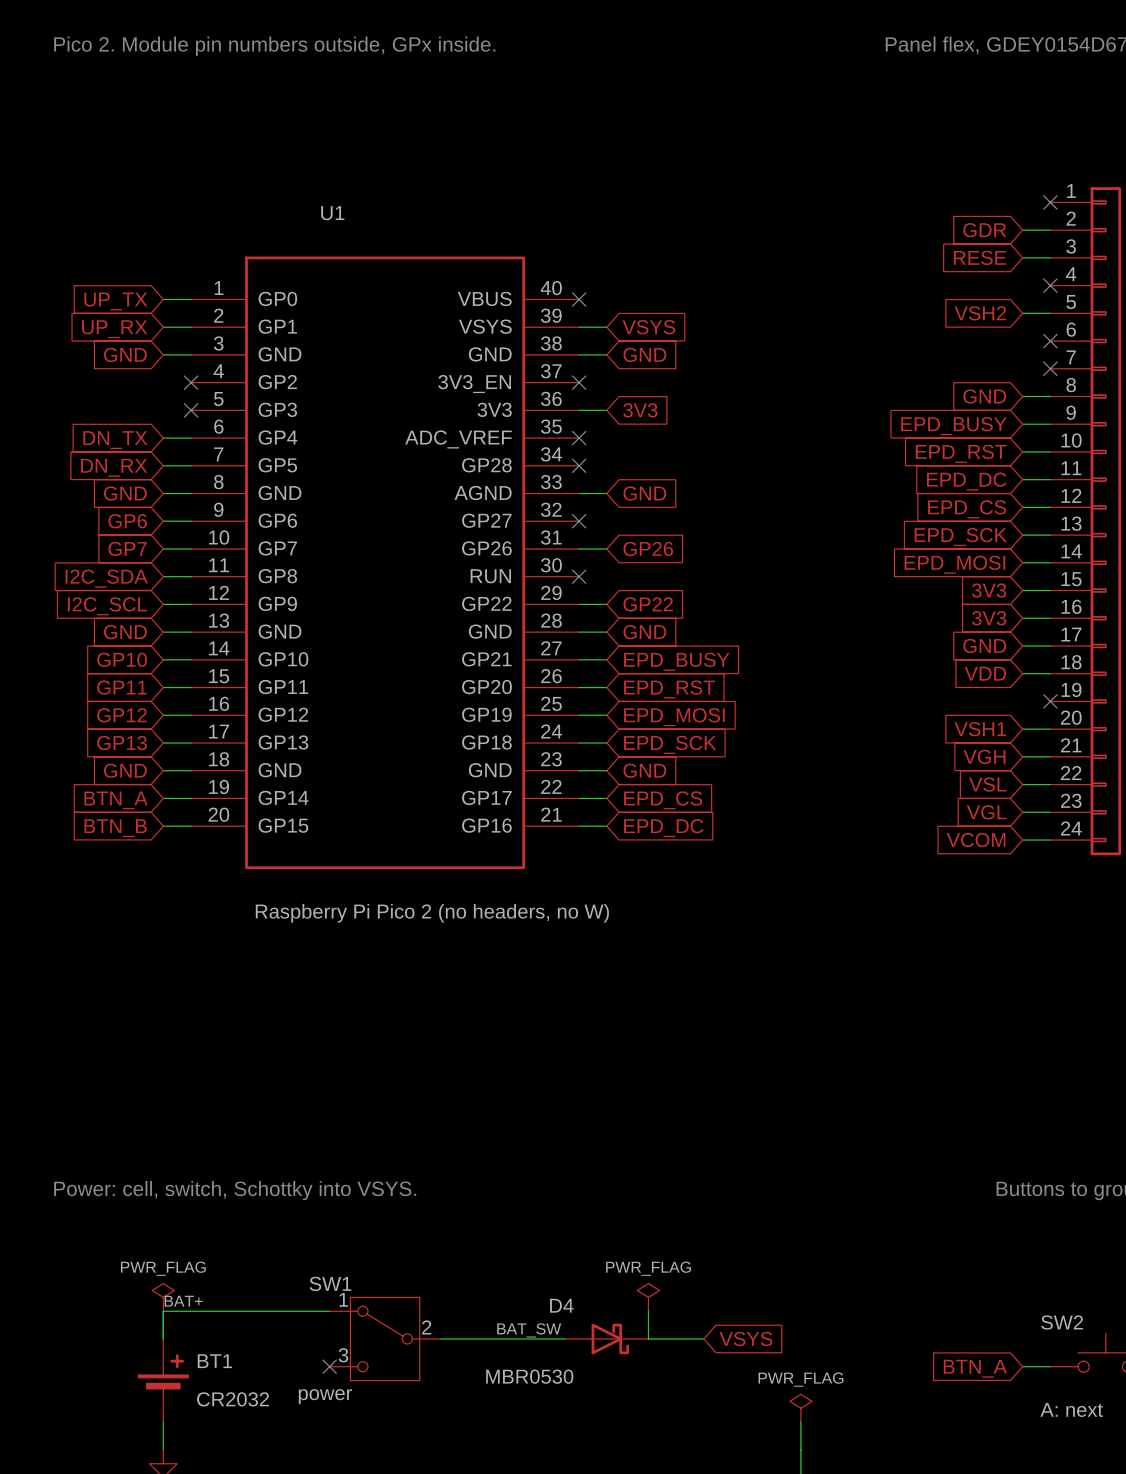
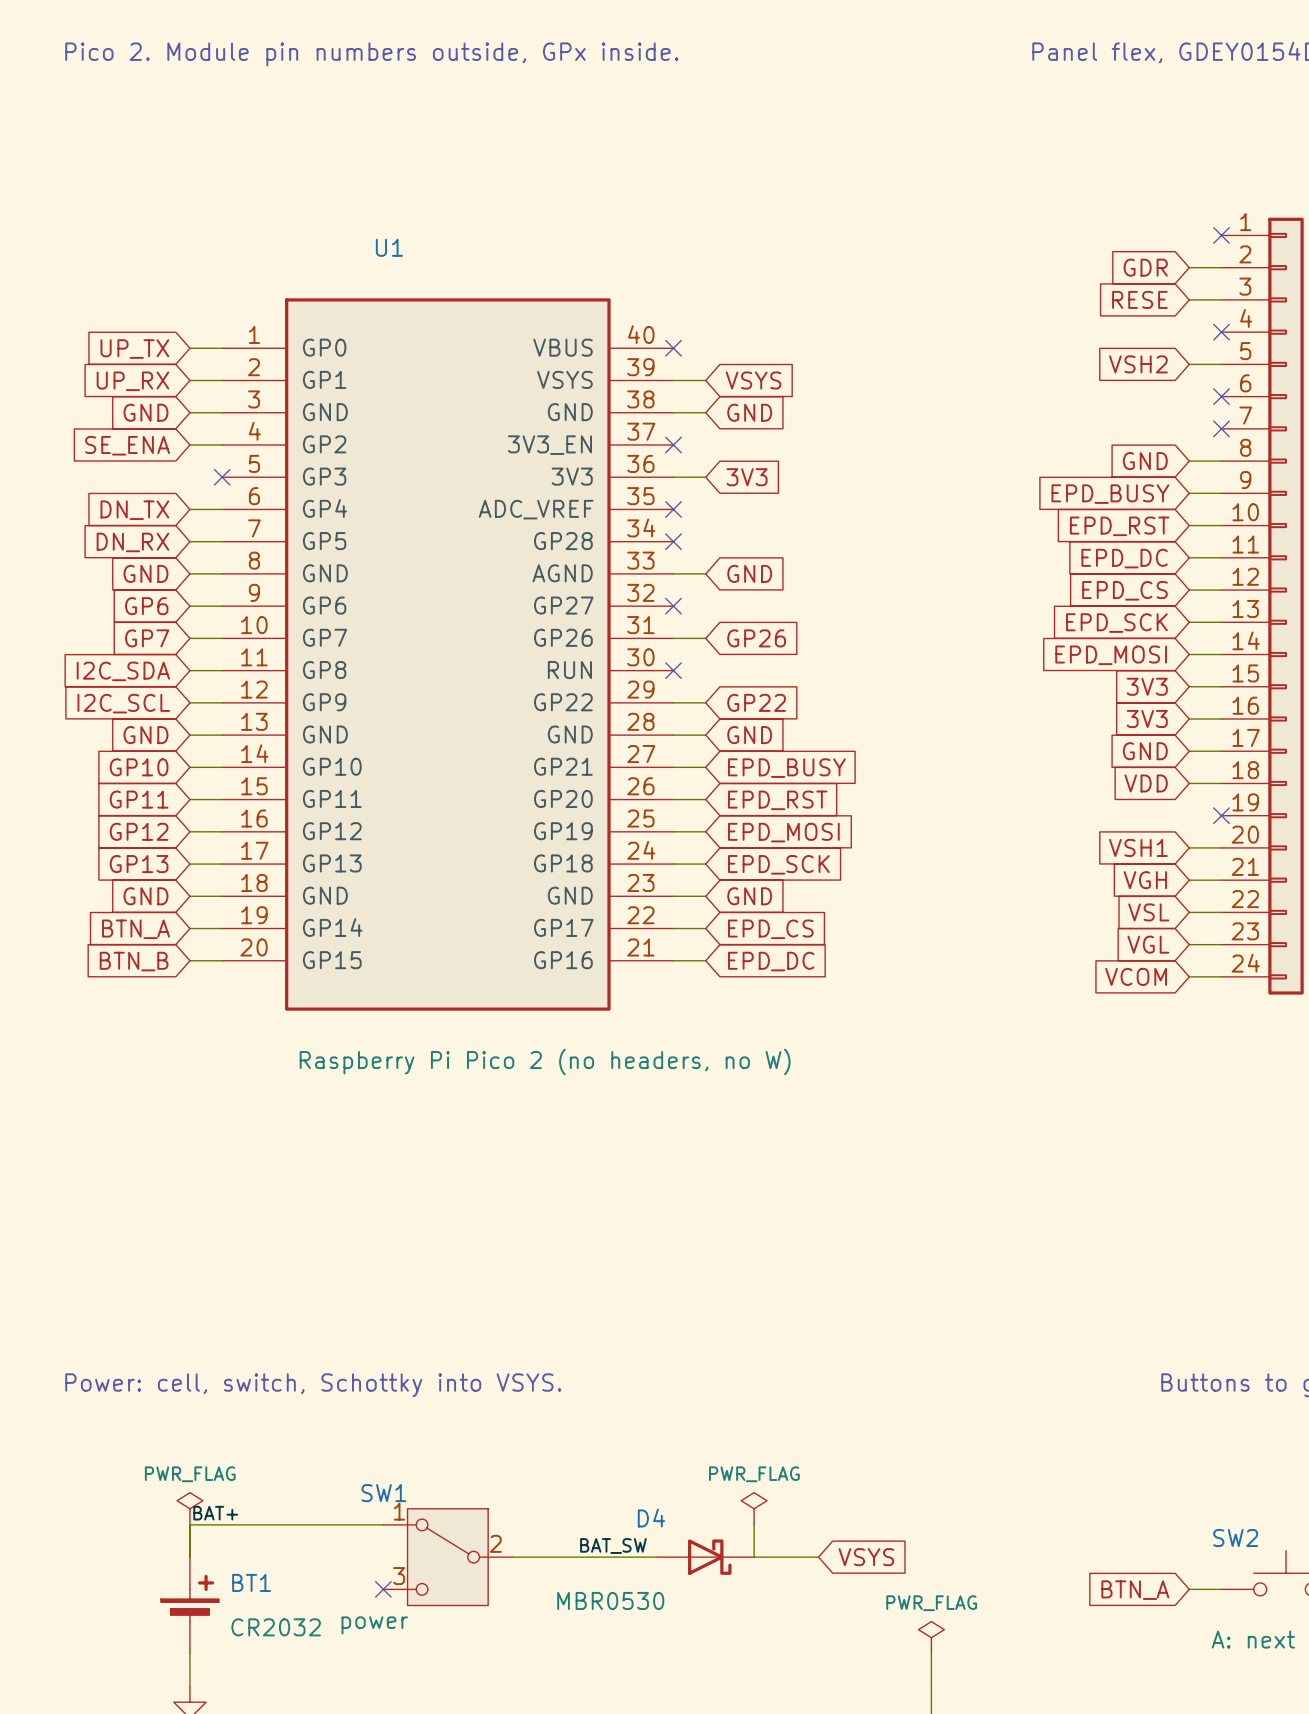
wire: none -> (189, 444) (222, 444)
no-connect mark: (191, 382) -> none
global label: none -> SE_ENA (127, 445)

